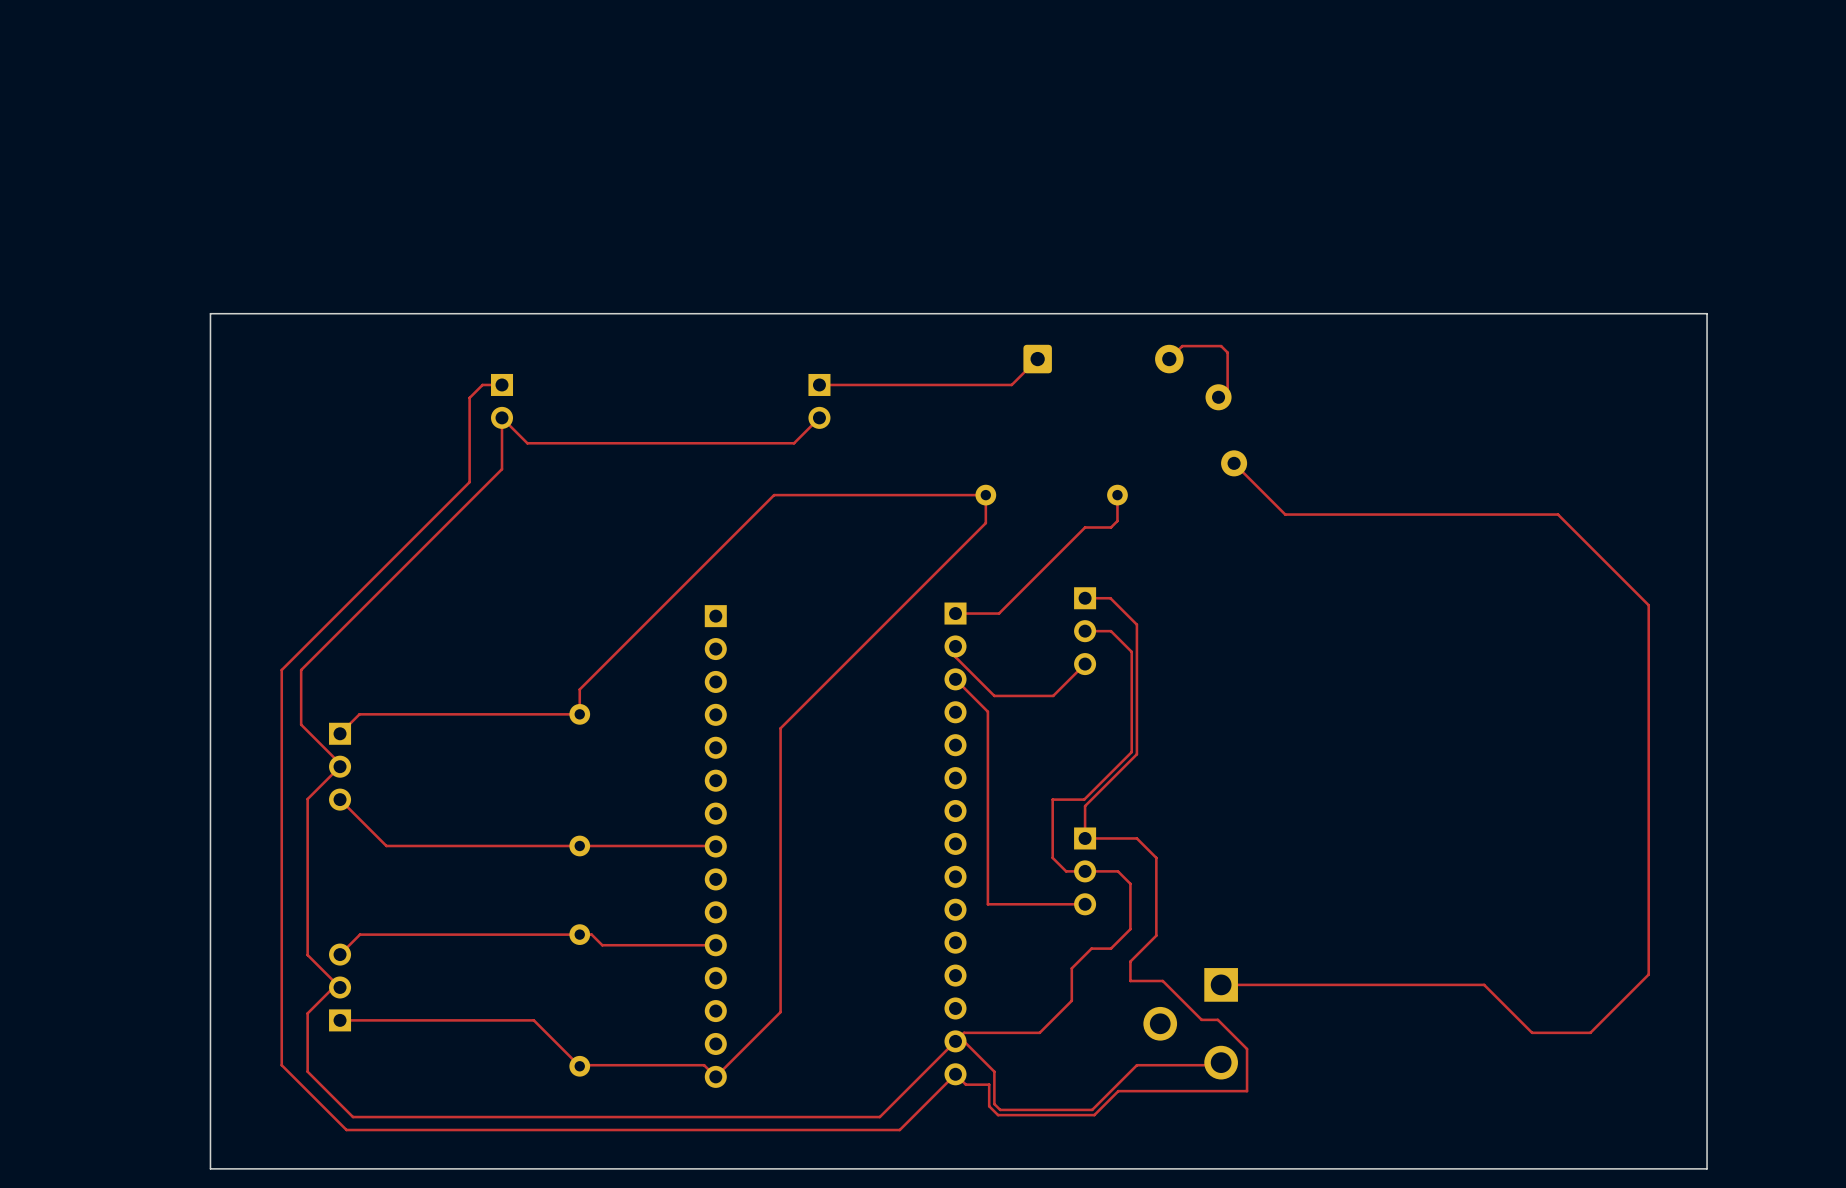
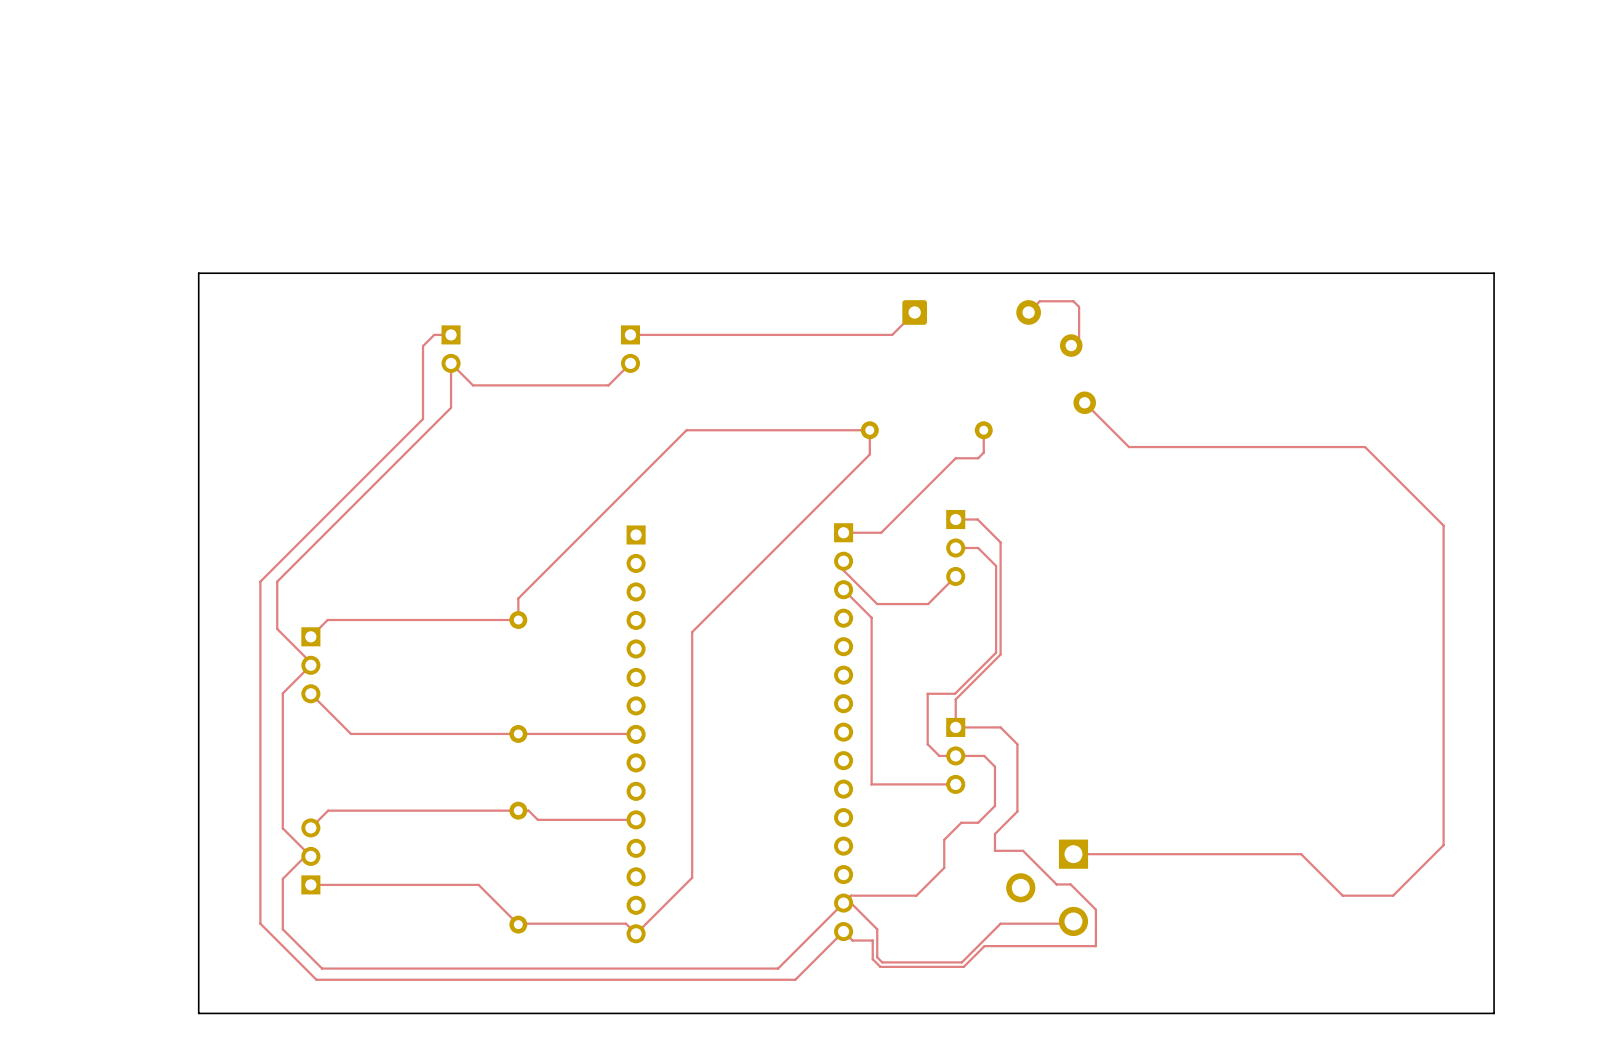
top track: none -> (725, 334) (630, 334)
part position: (819, 401) -> (630, 349)
top track: (819, 417) (794, 443) (683, 443) -> (630, 363) (608, 385)

